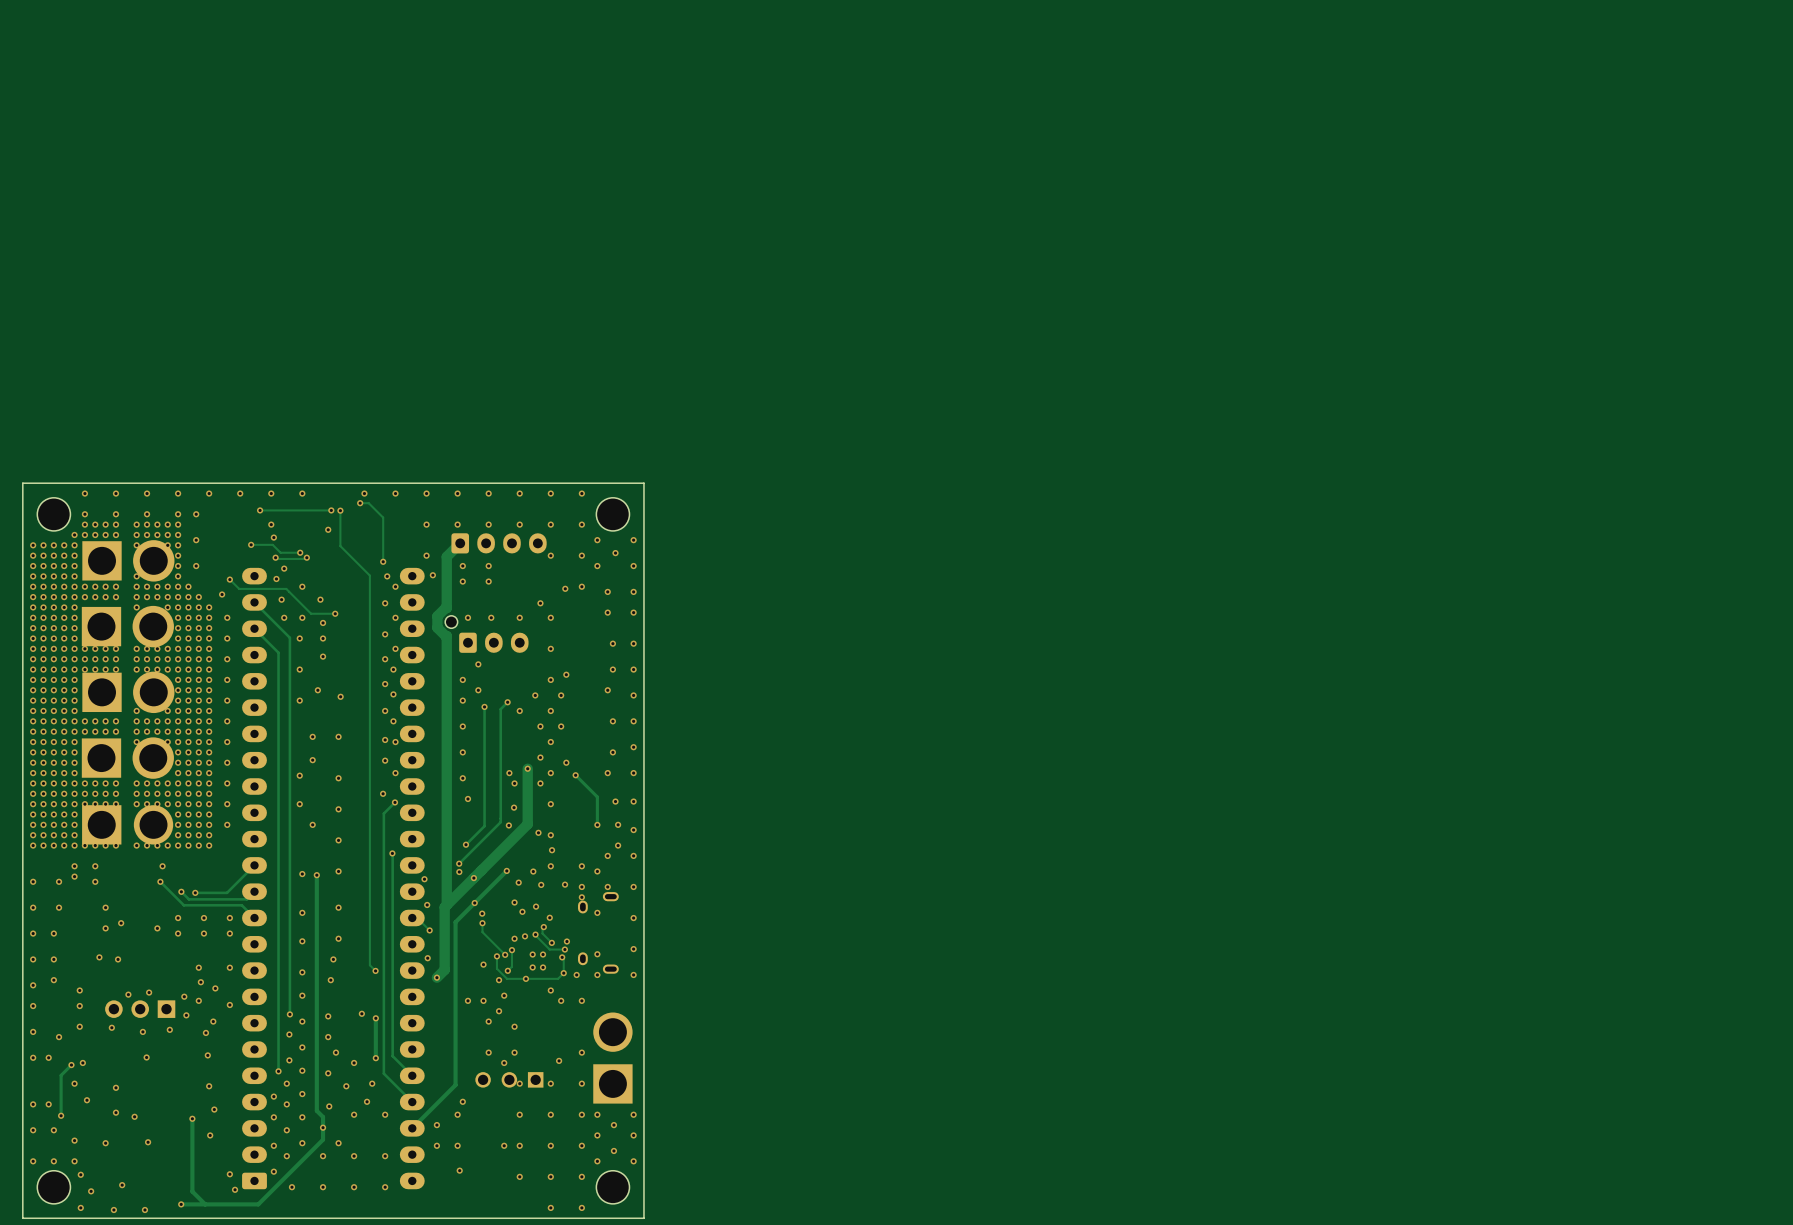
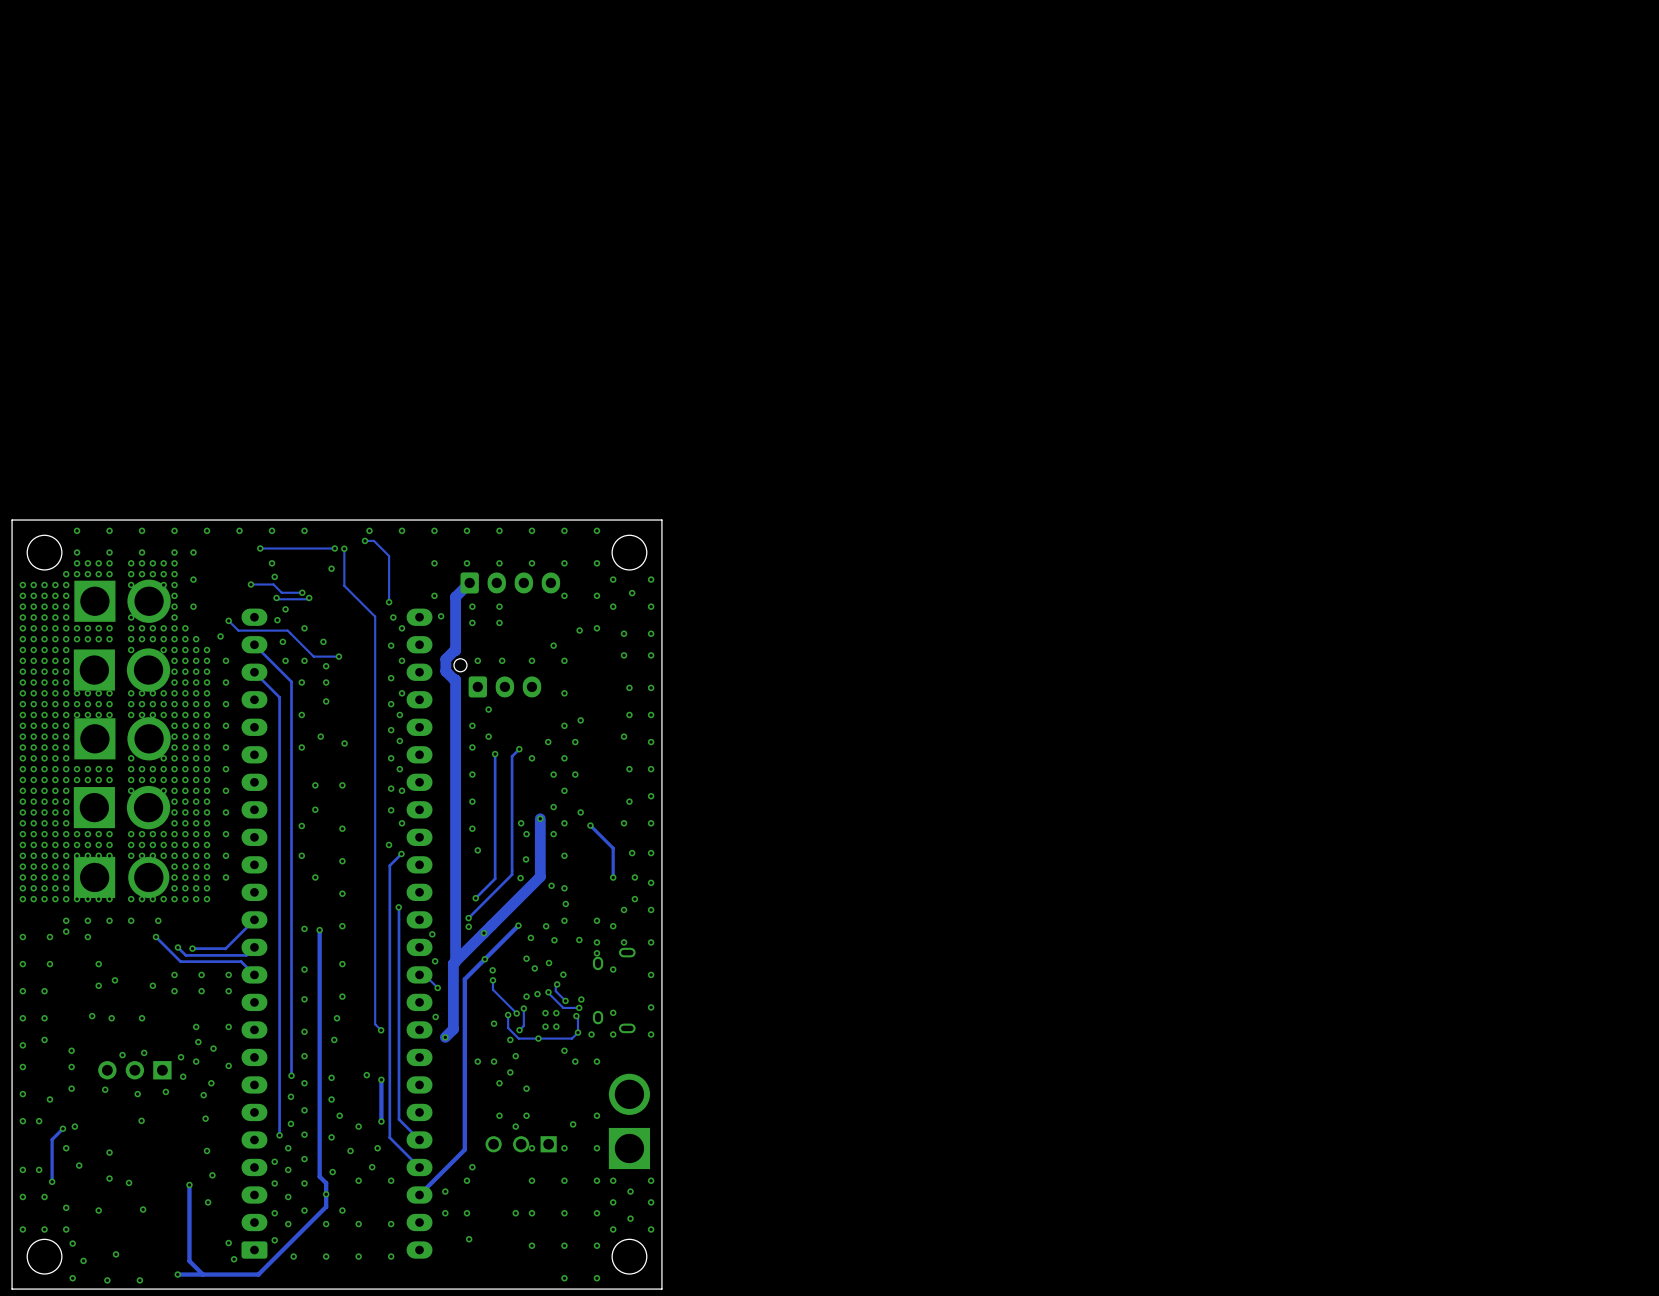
via: none -> (109, 920)
via: none -> (131, 920)
via: none -> (142, 1018)

